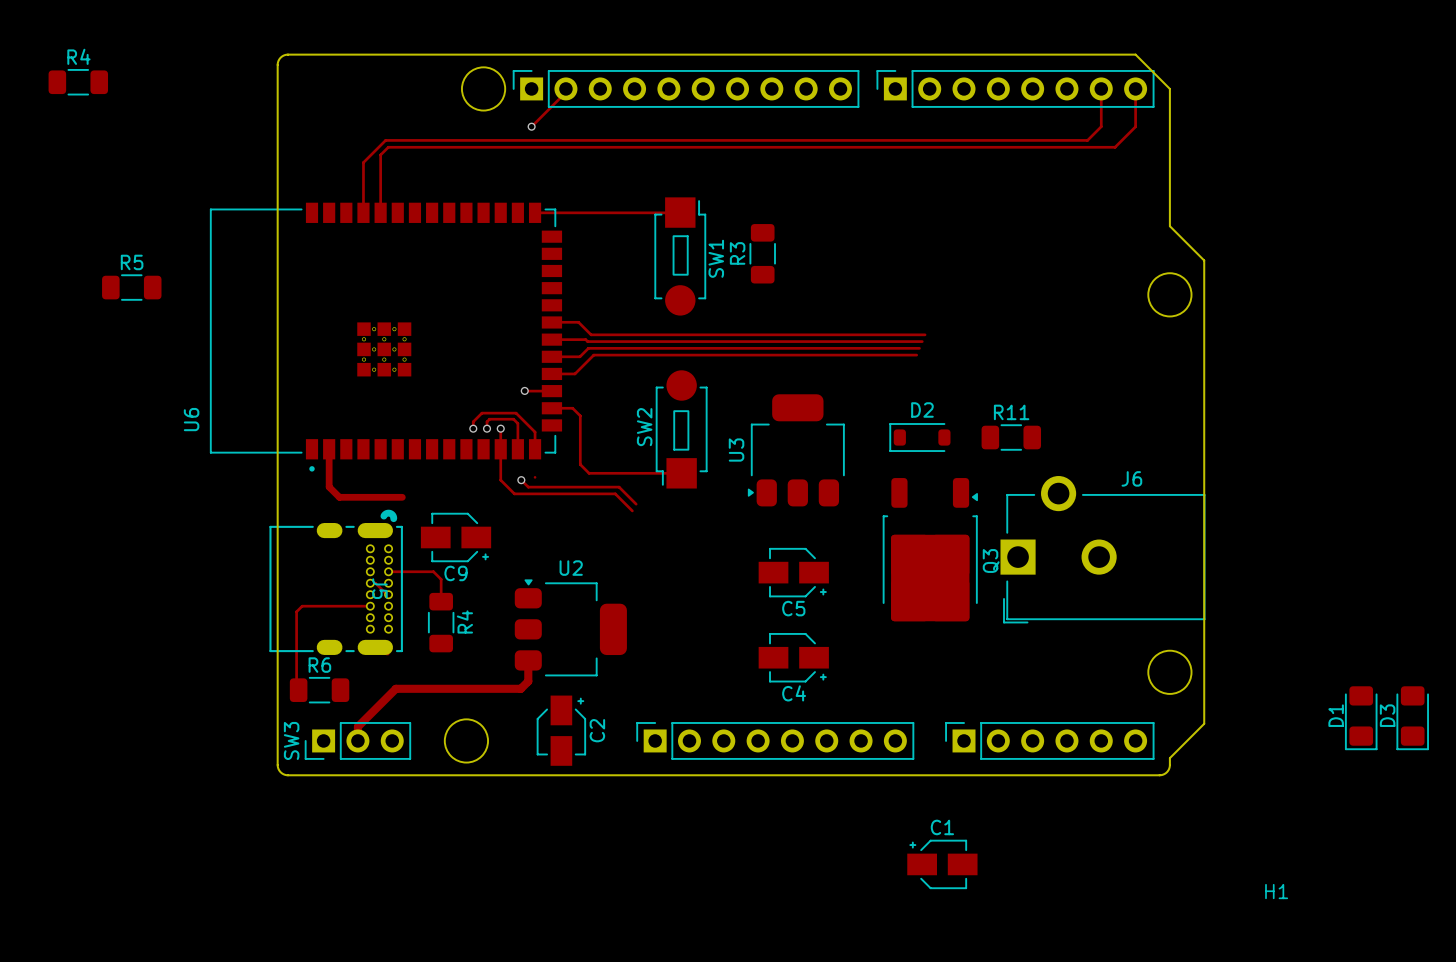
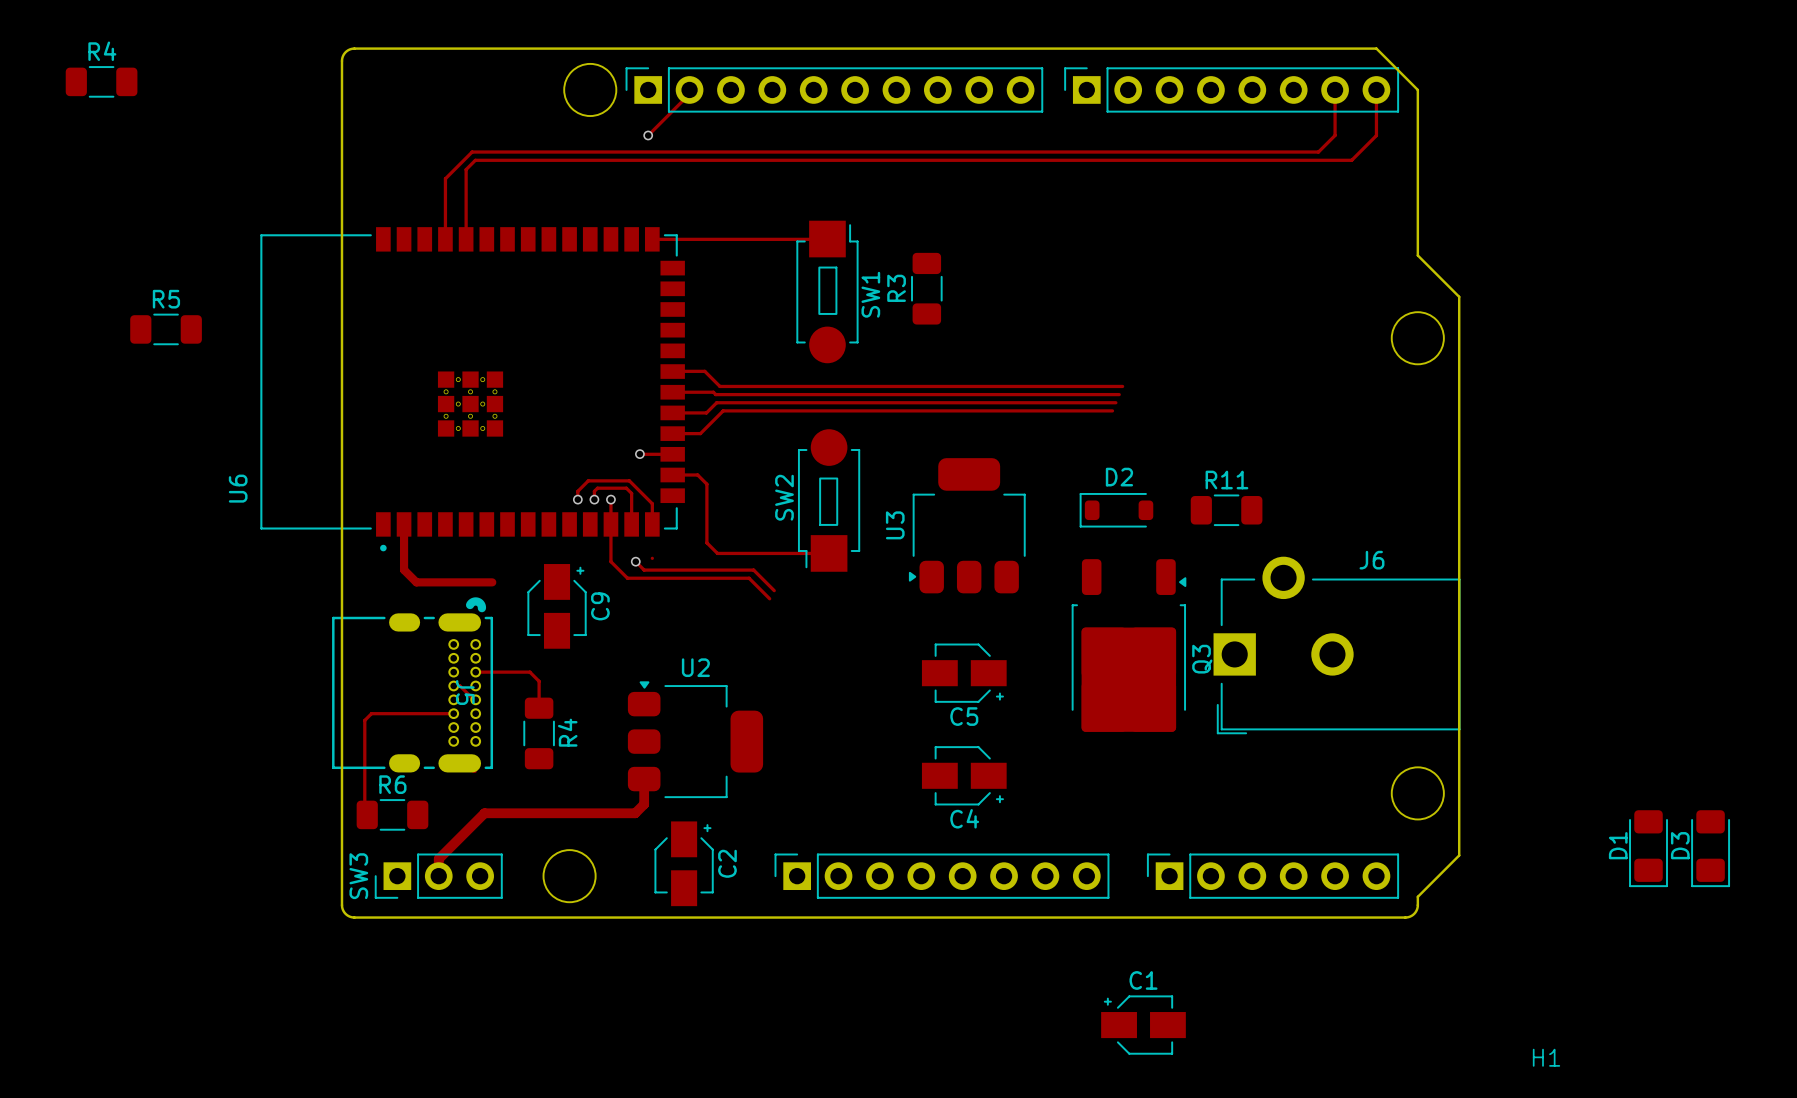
C9 rotation: 0° (456, 537) -> 90° counterclockwise (557, 606)

